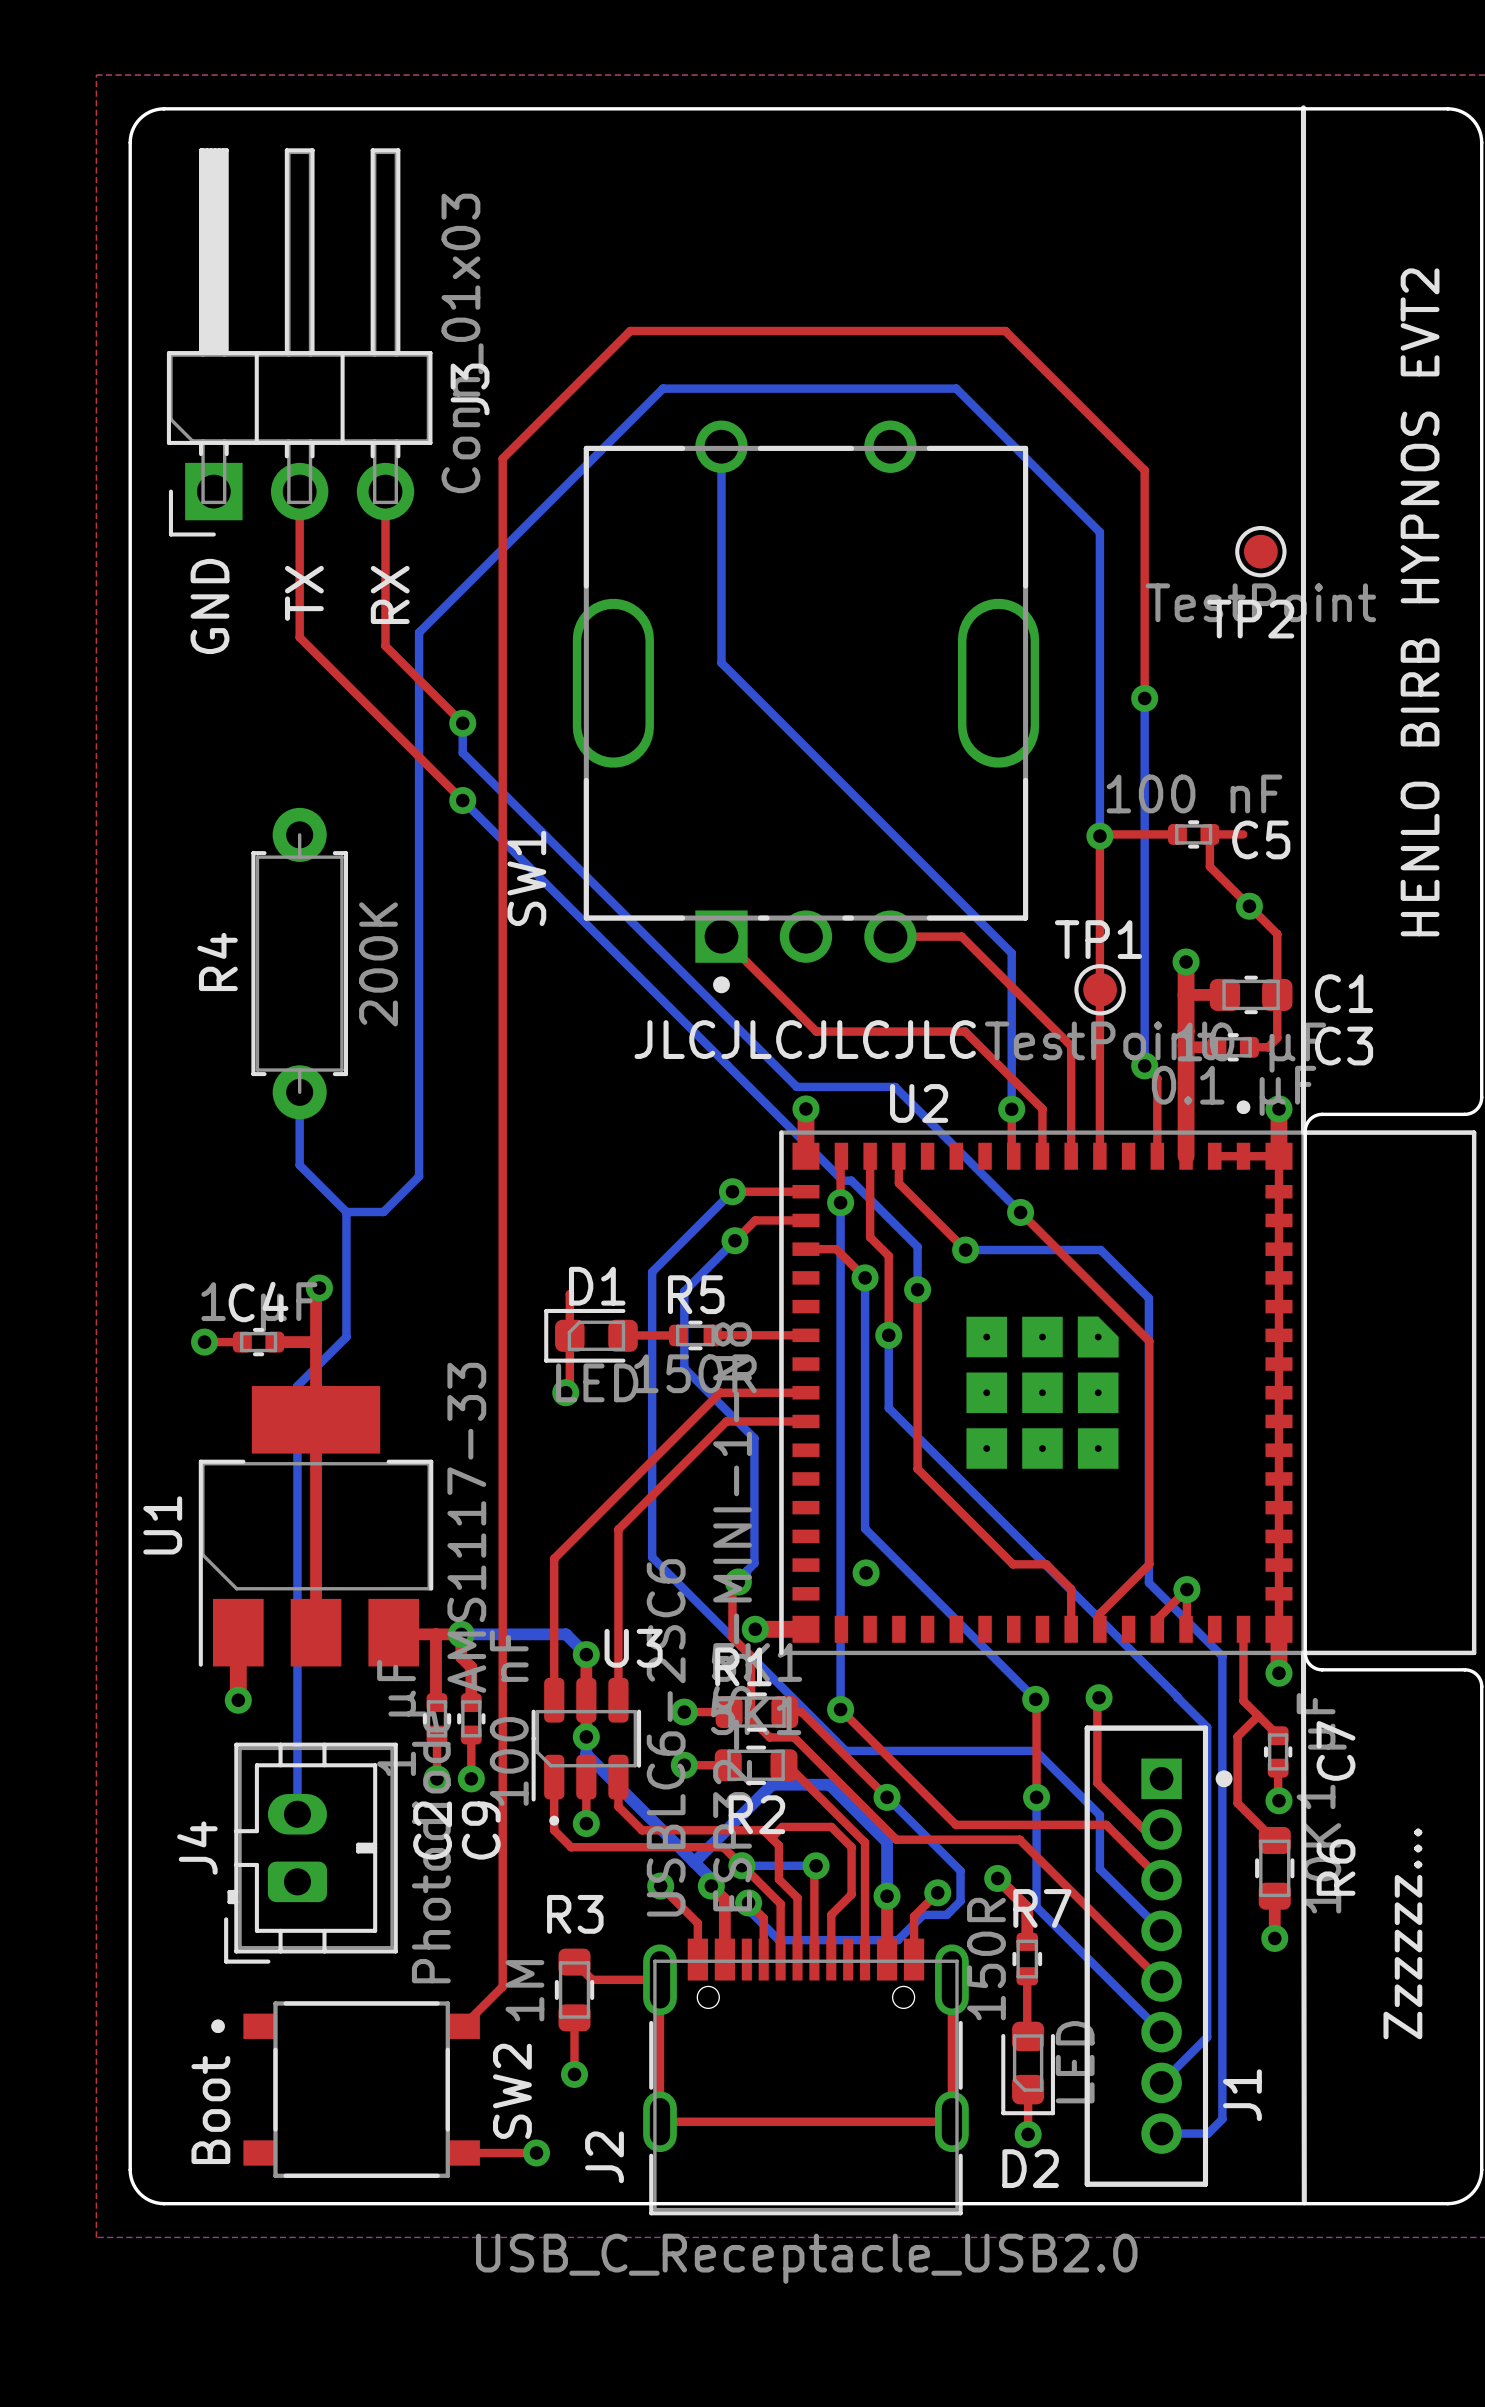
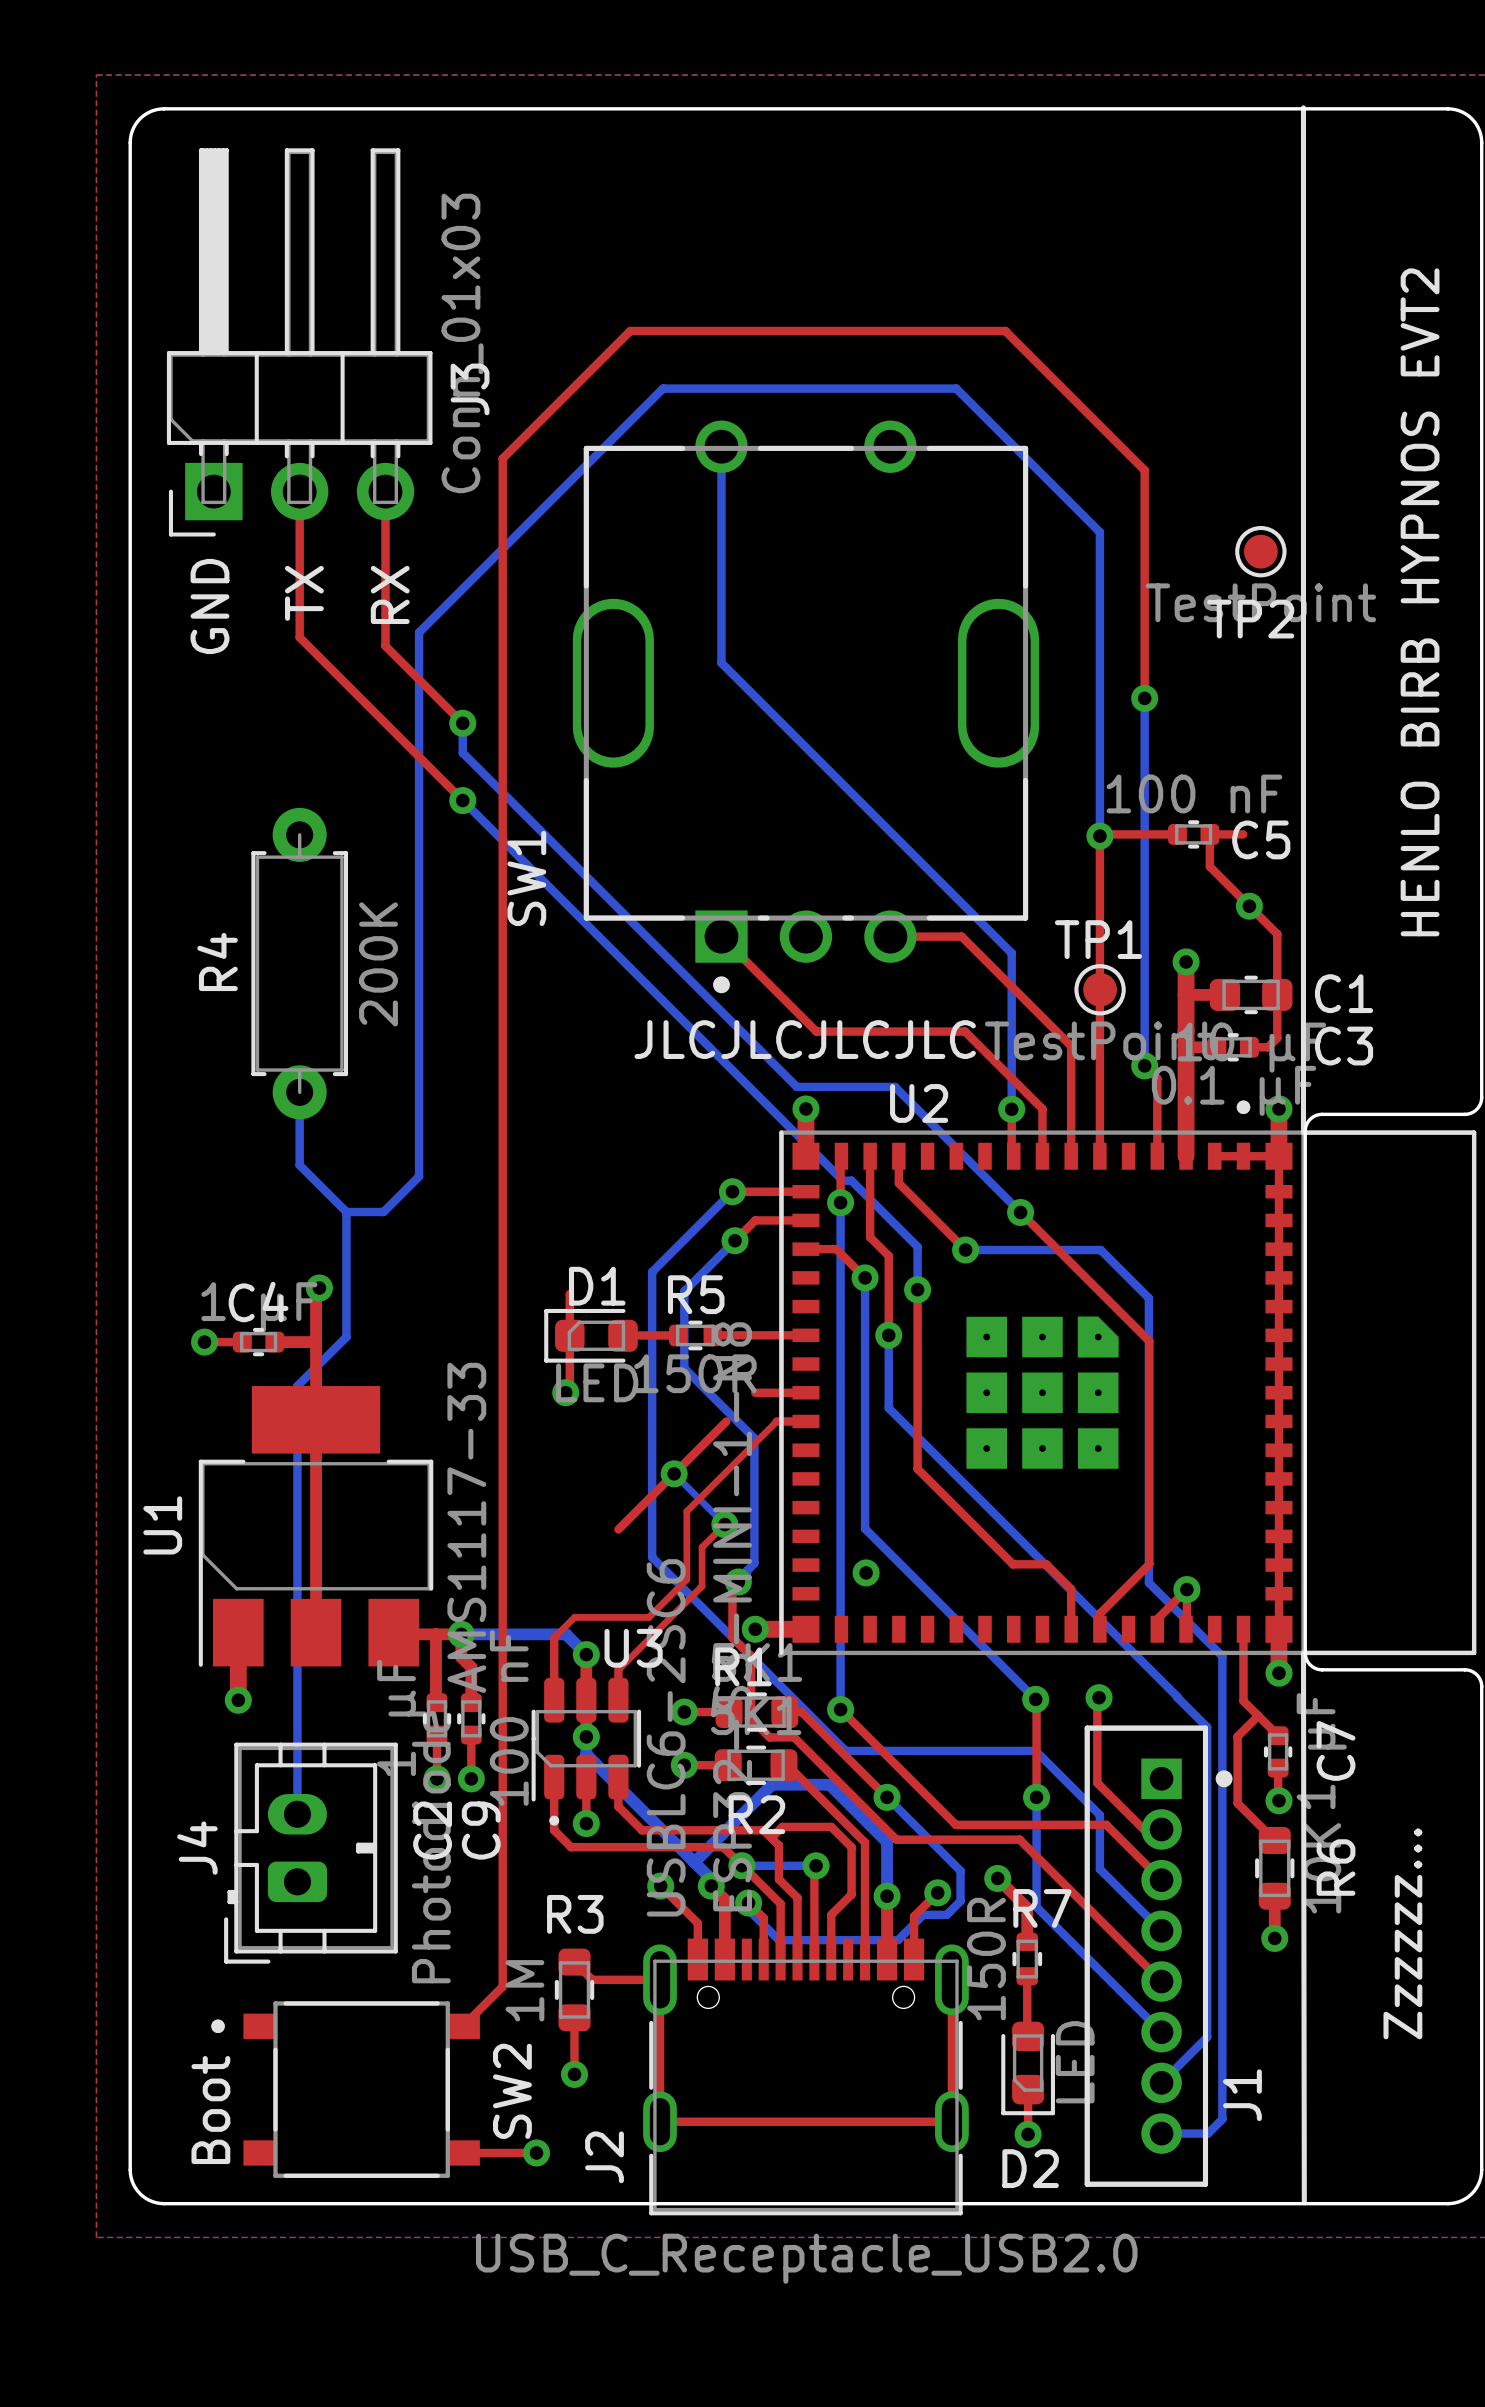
top track: (755, 1392) (720, 1392) (554, 1558) (554, 1637) -> (776, 1421) (686, 1511) (686, 1579) (648, 1617) (574, 1617) (554, 1637)
top track: (726, 1421) (776, 1421) -> none
bottom track: none -> (674, 1473) (724, 1524)
via: none -> (674, 1473)
via: none -> (724, 1524)
top track: (618, 1529) (618, 1669) -> (724, 1524) (702, 1547) (702, 1586) (618, 1669)

